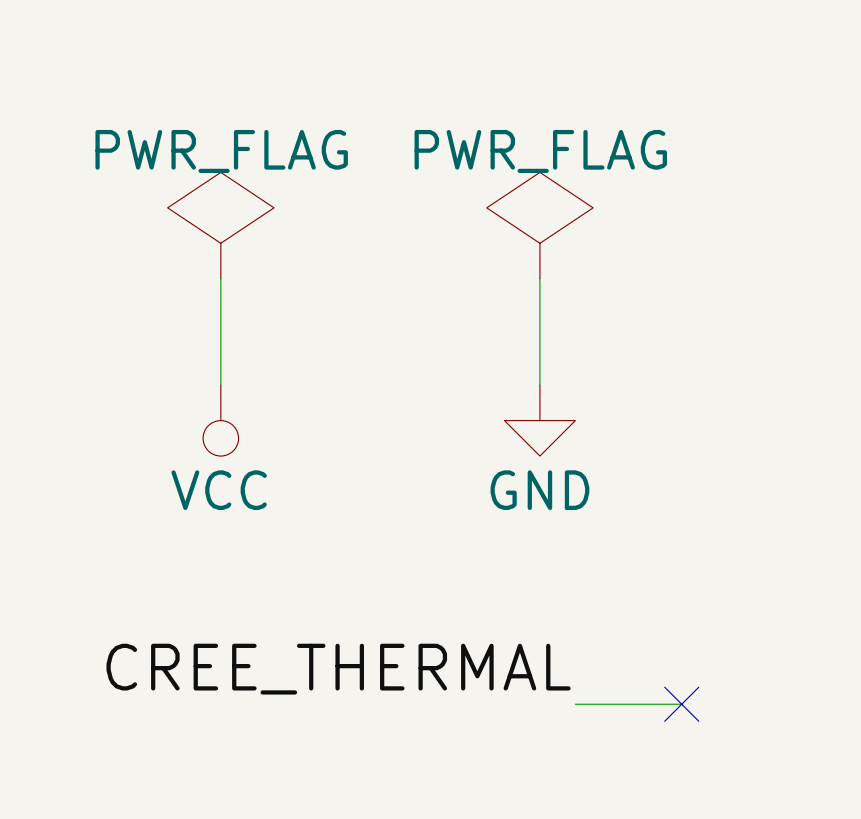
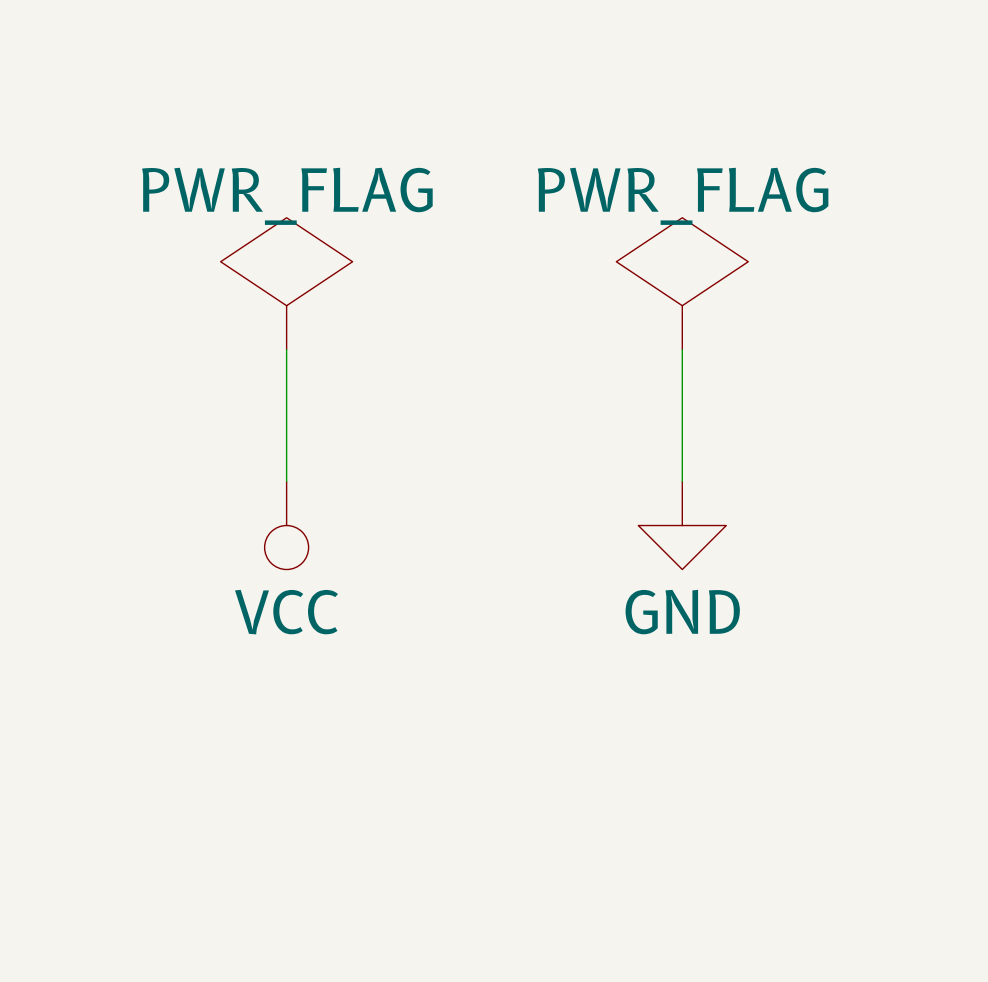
label: CREE_THERMAL (338, 669) -> none
wire: (575, 704) (681, 704) -> none
no-connect mark: (681, 704) -> none

